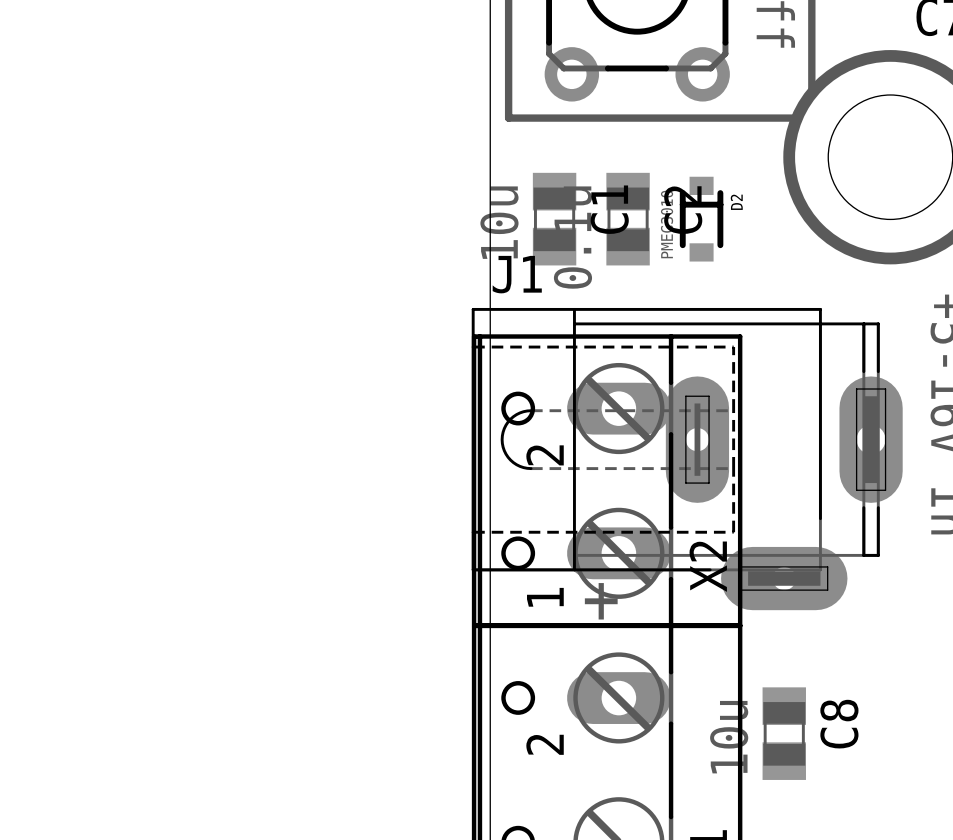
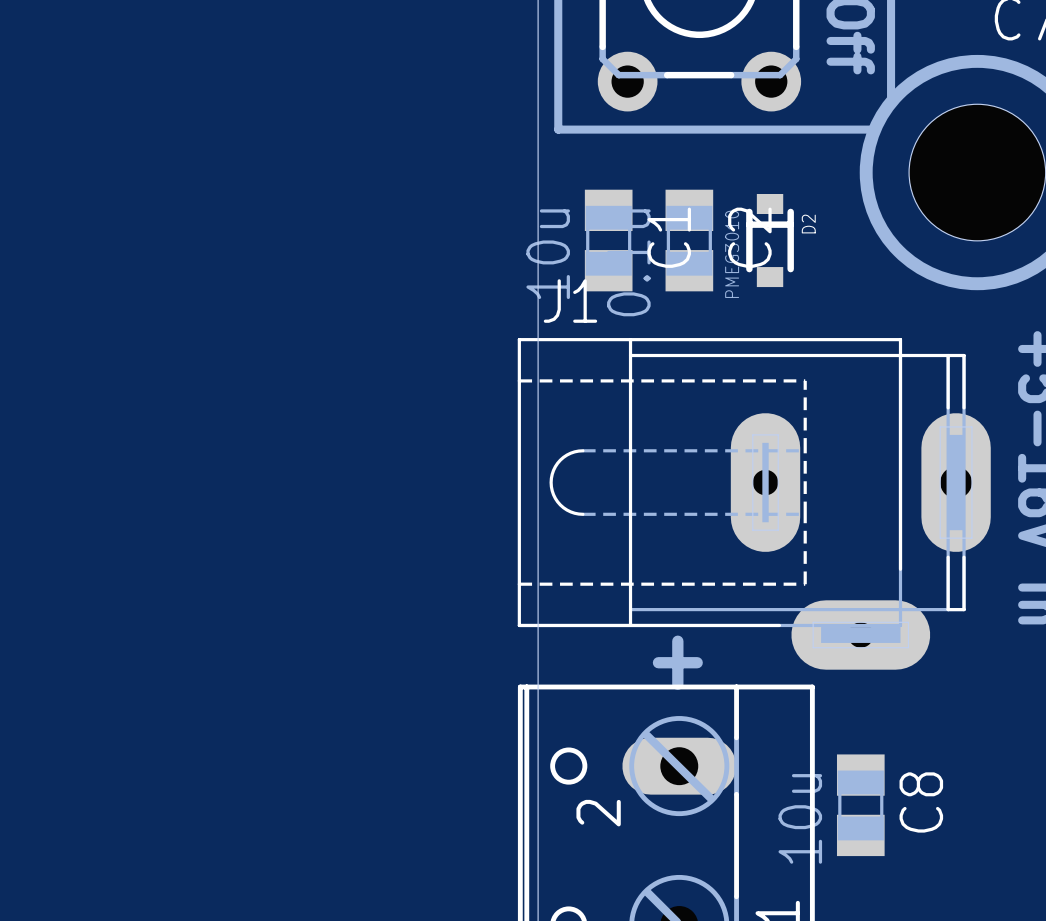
X2: (607, 480) -> none

